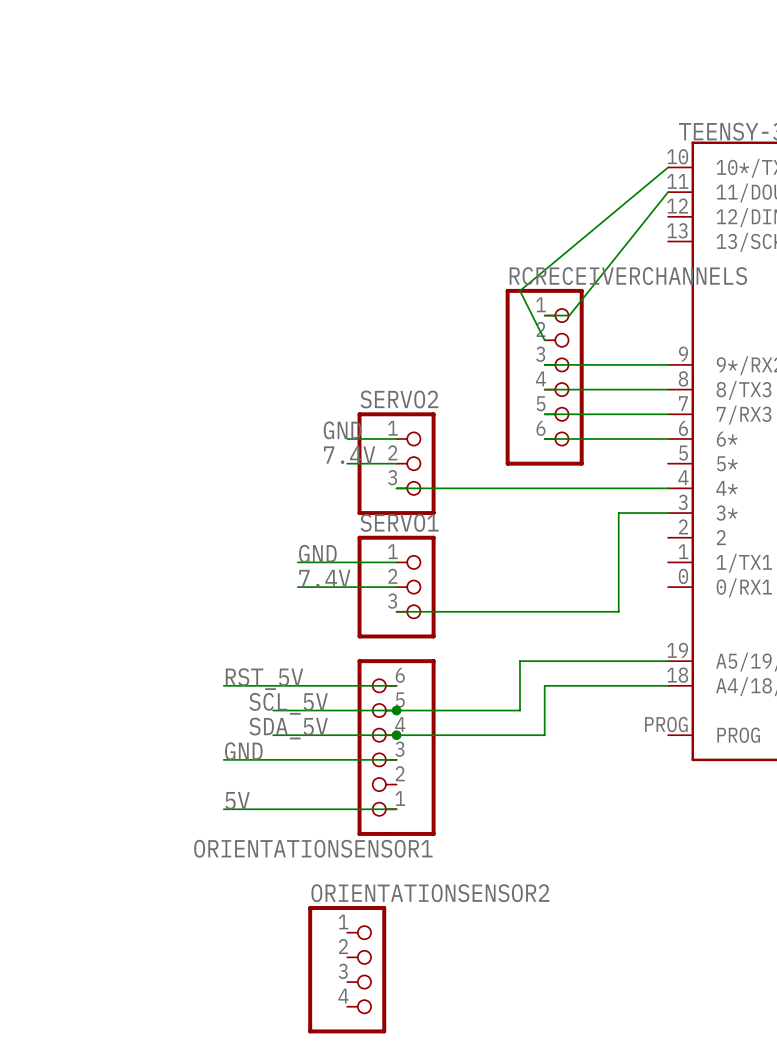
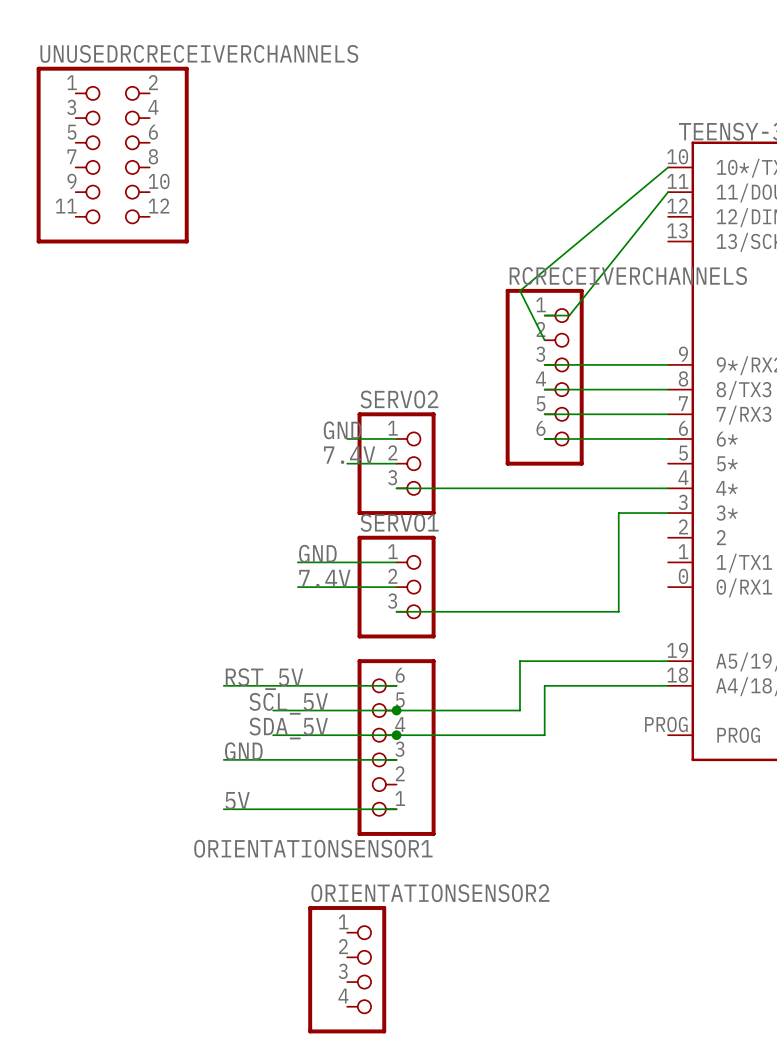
UNUSEDRCRECEIVERCHANNELS: none -> (112, 155)

